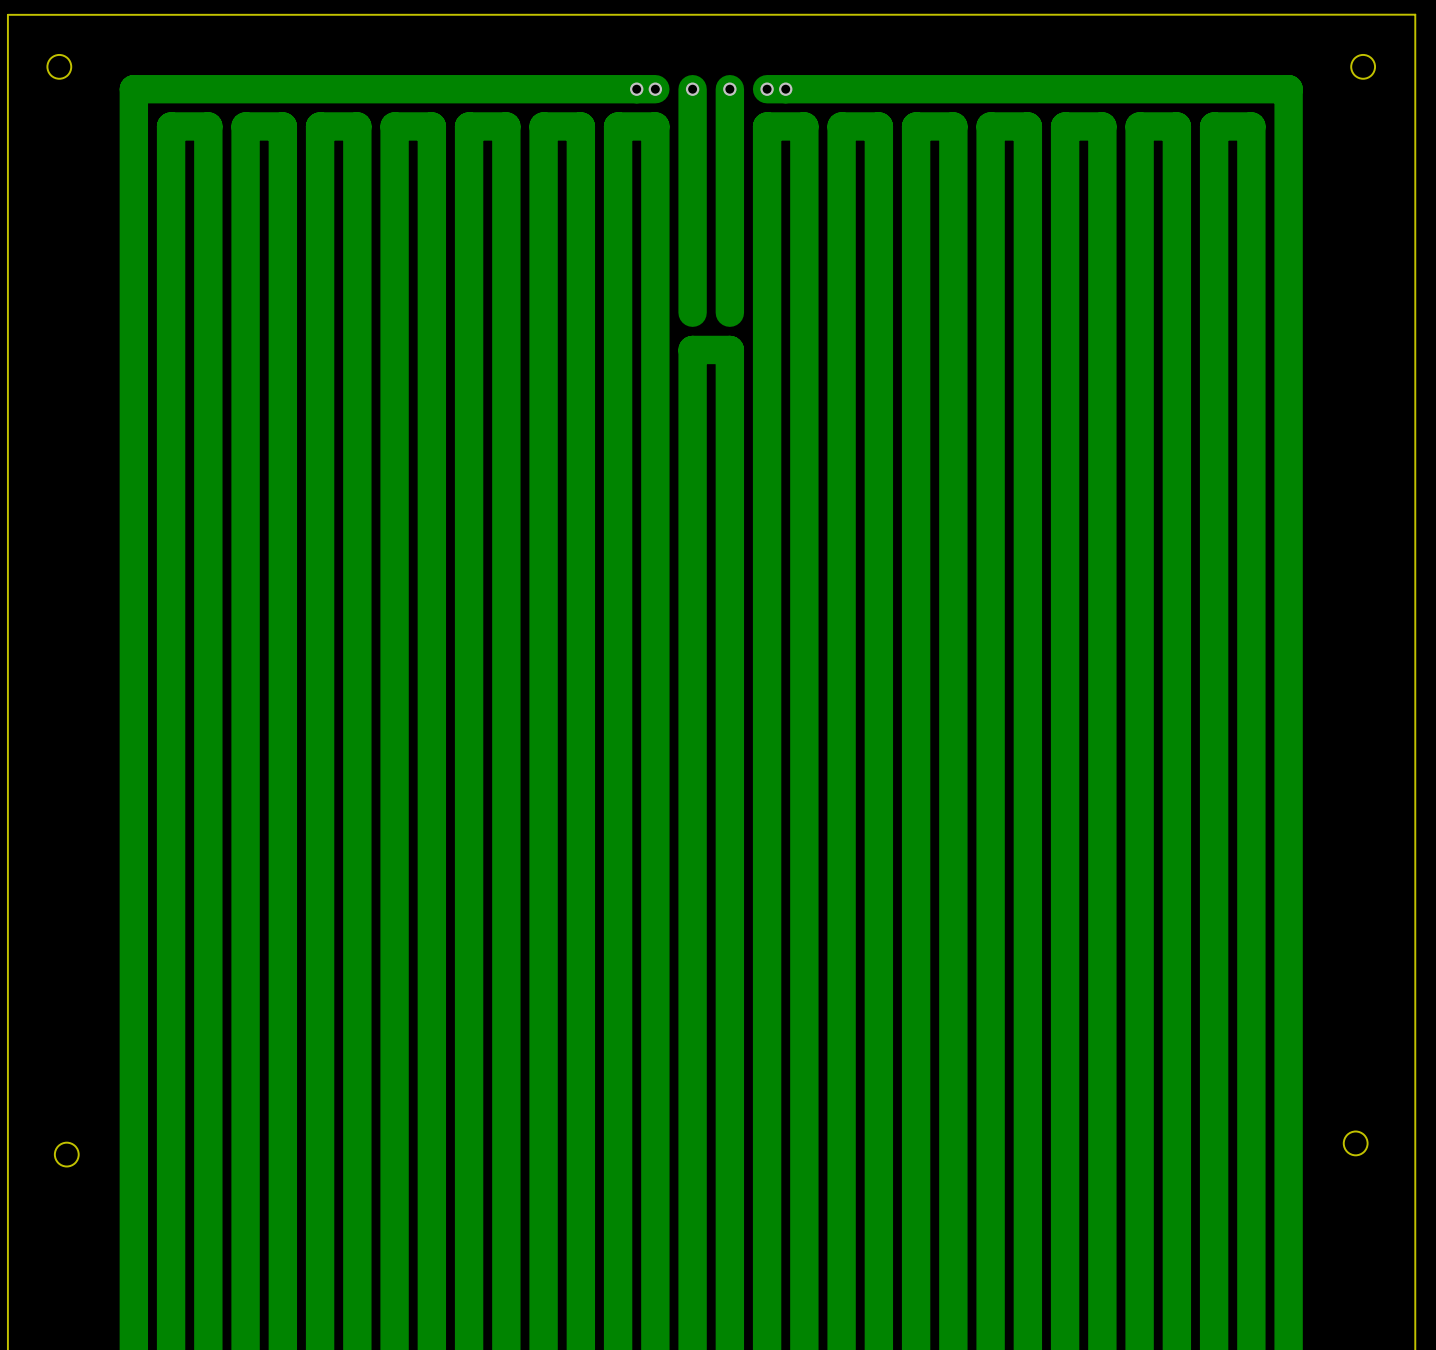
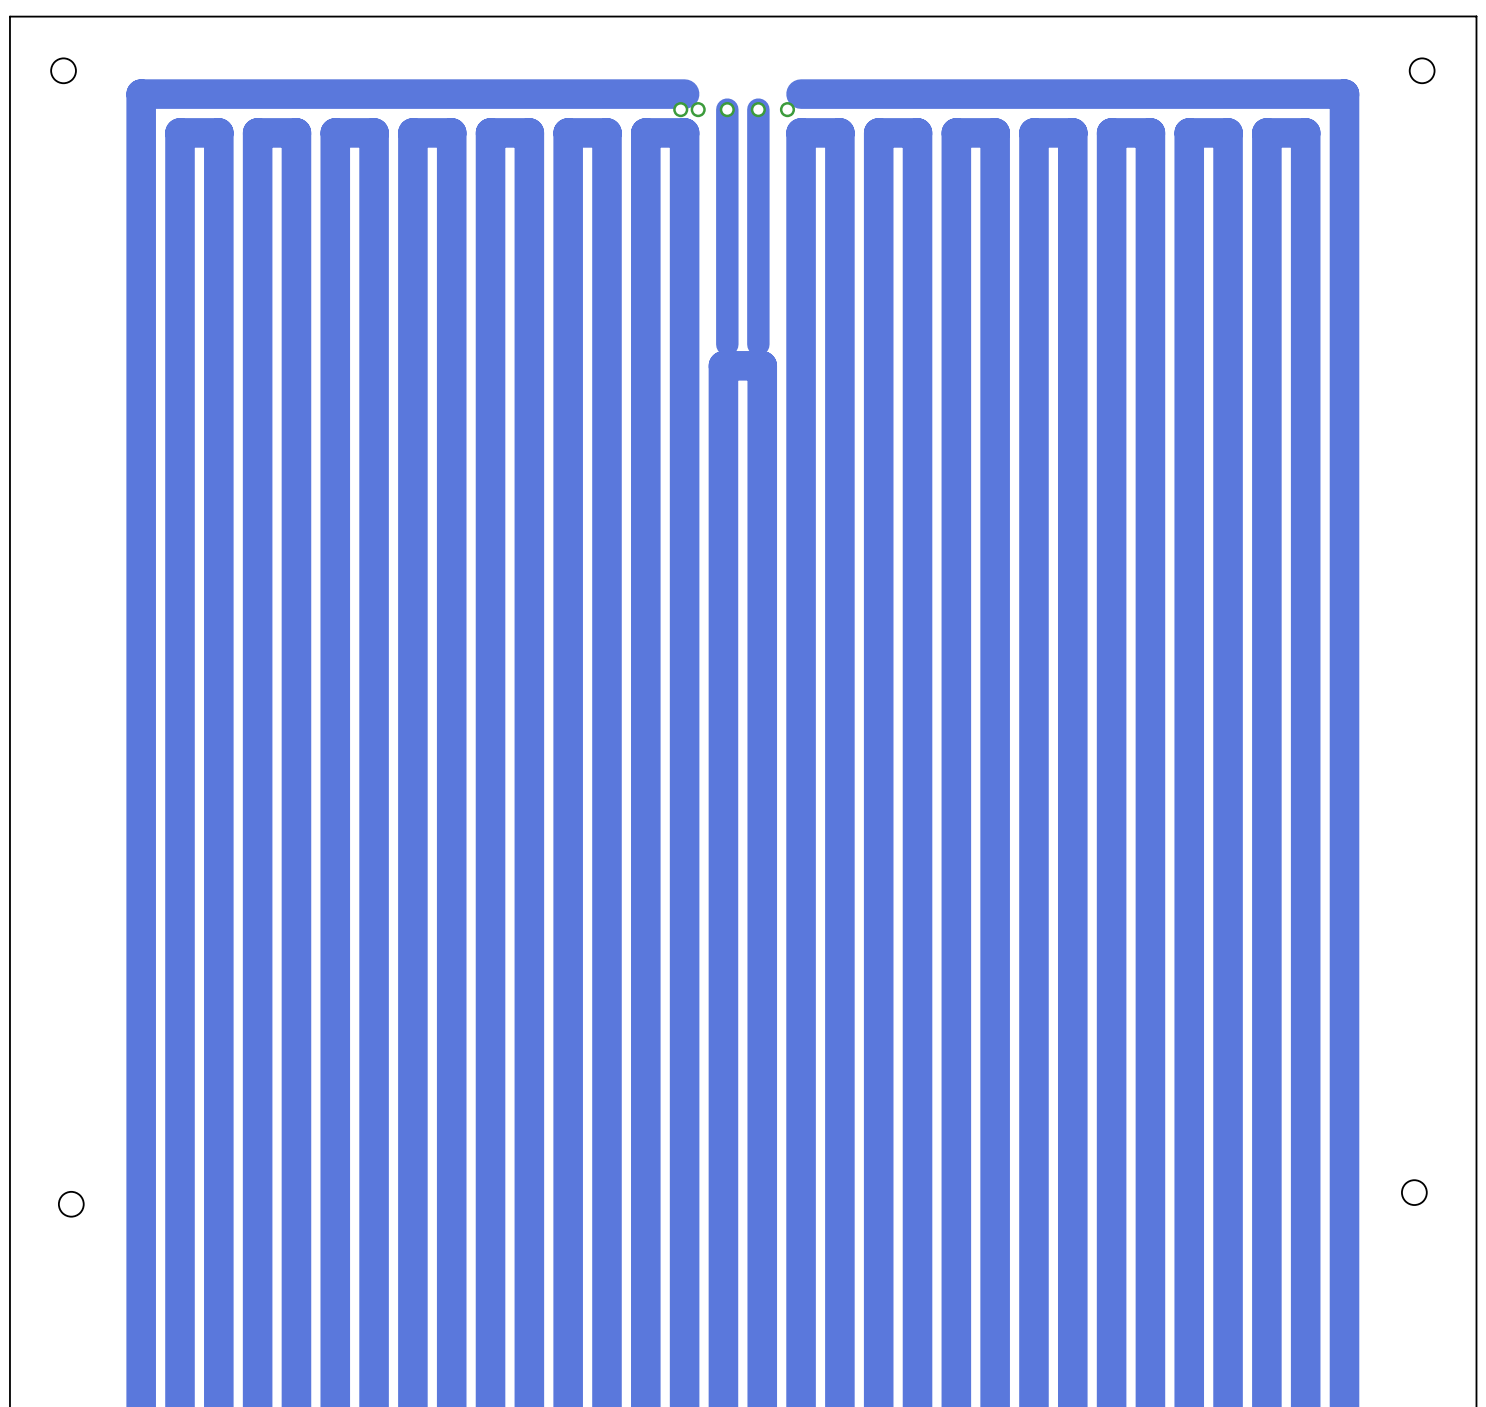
via: (636, 89) -> none
via: (655, 89) -> none
track: (692, 89) (692, 312) -> none
via: (692, 89) -> none
track: (729, 89) (729, 312) -> none
via: (729, 89) -> none
via: (767, 89) -> none
via: (785, 89) -> none
via: none -> (680, 109)
via: none -> (698, 109)
track: none -> (727, 109) (727, 344)
via: none -> (727, 109)
track: none -> (758, 109) (758, 344)
via: none -> (758, 109)
via: none -> (787, 109)

